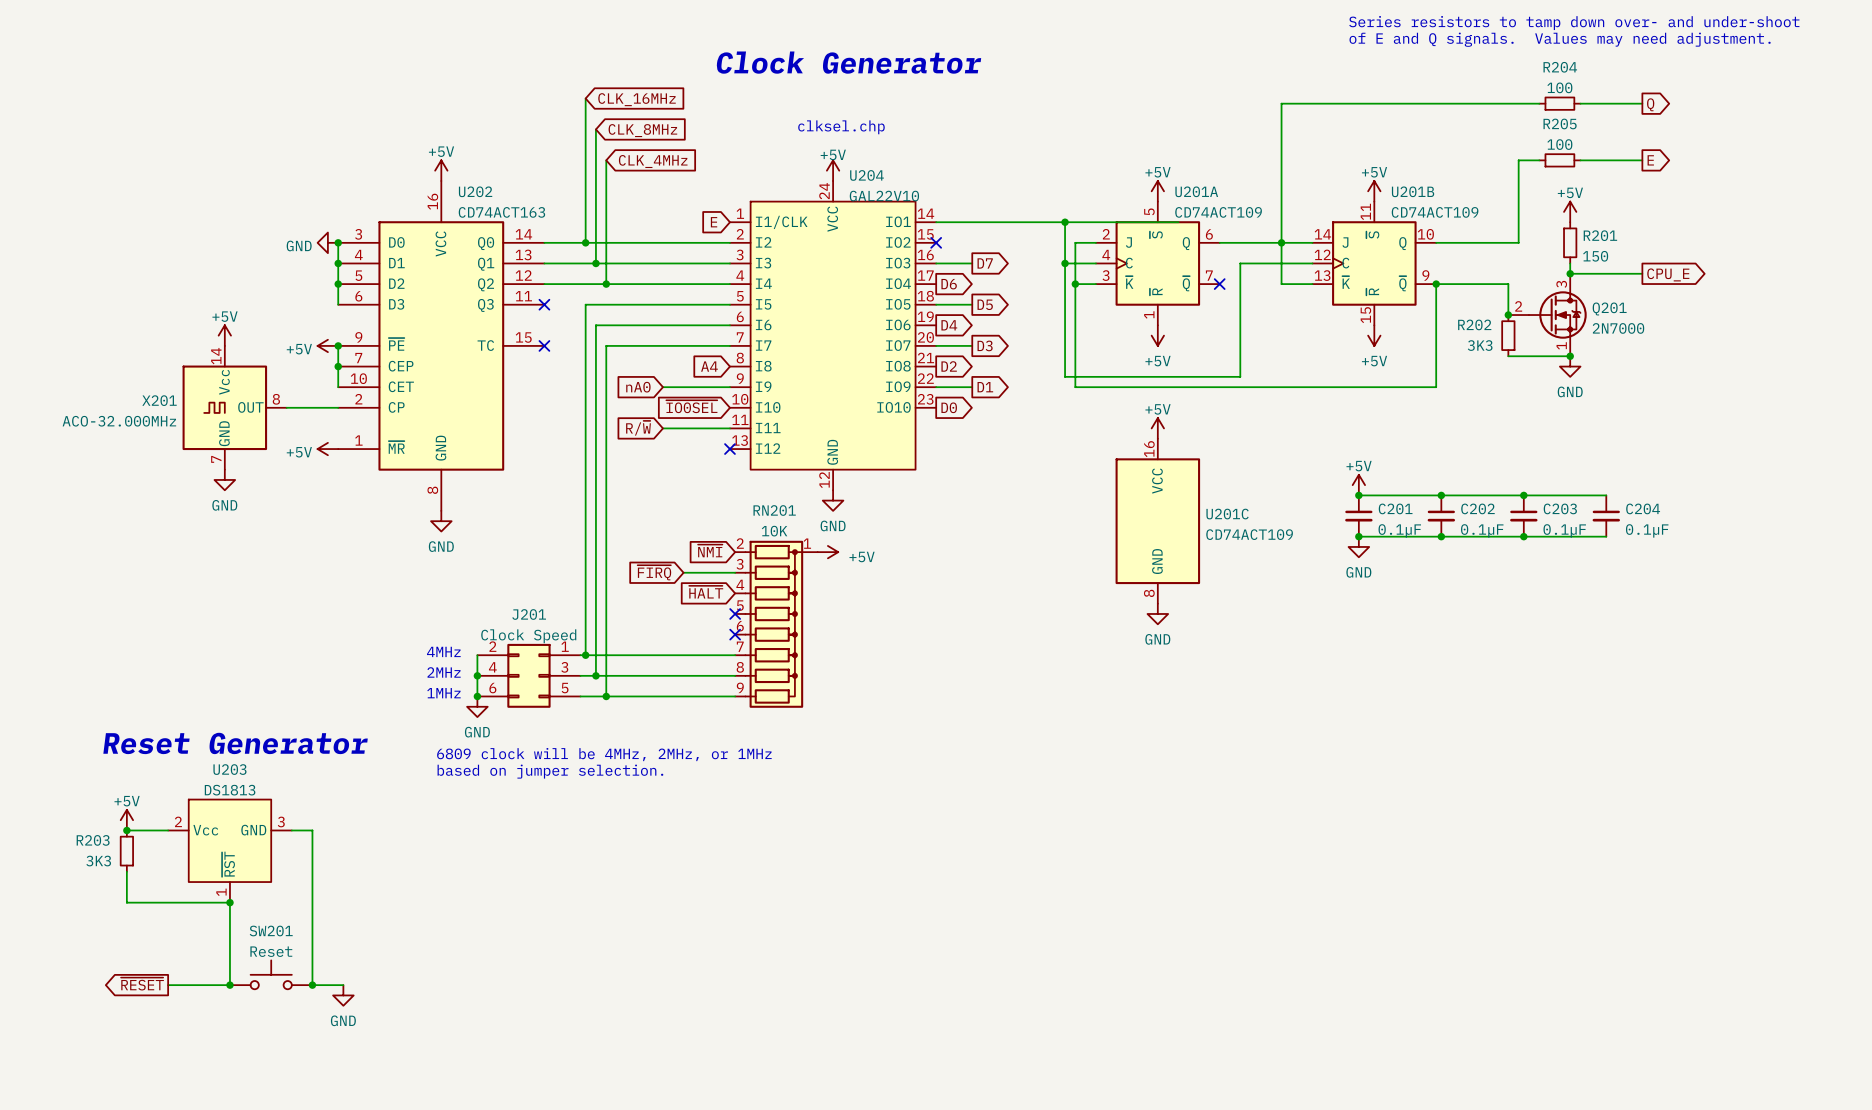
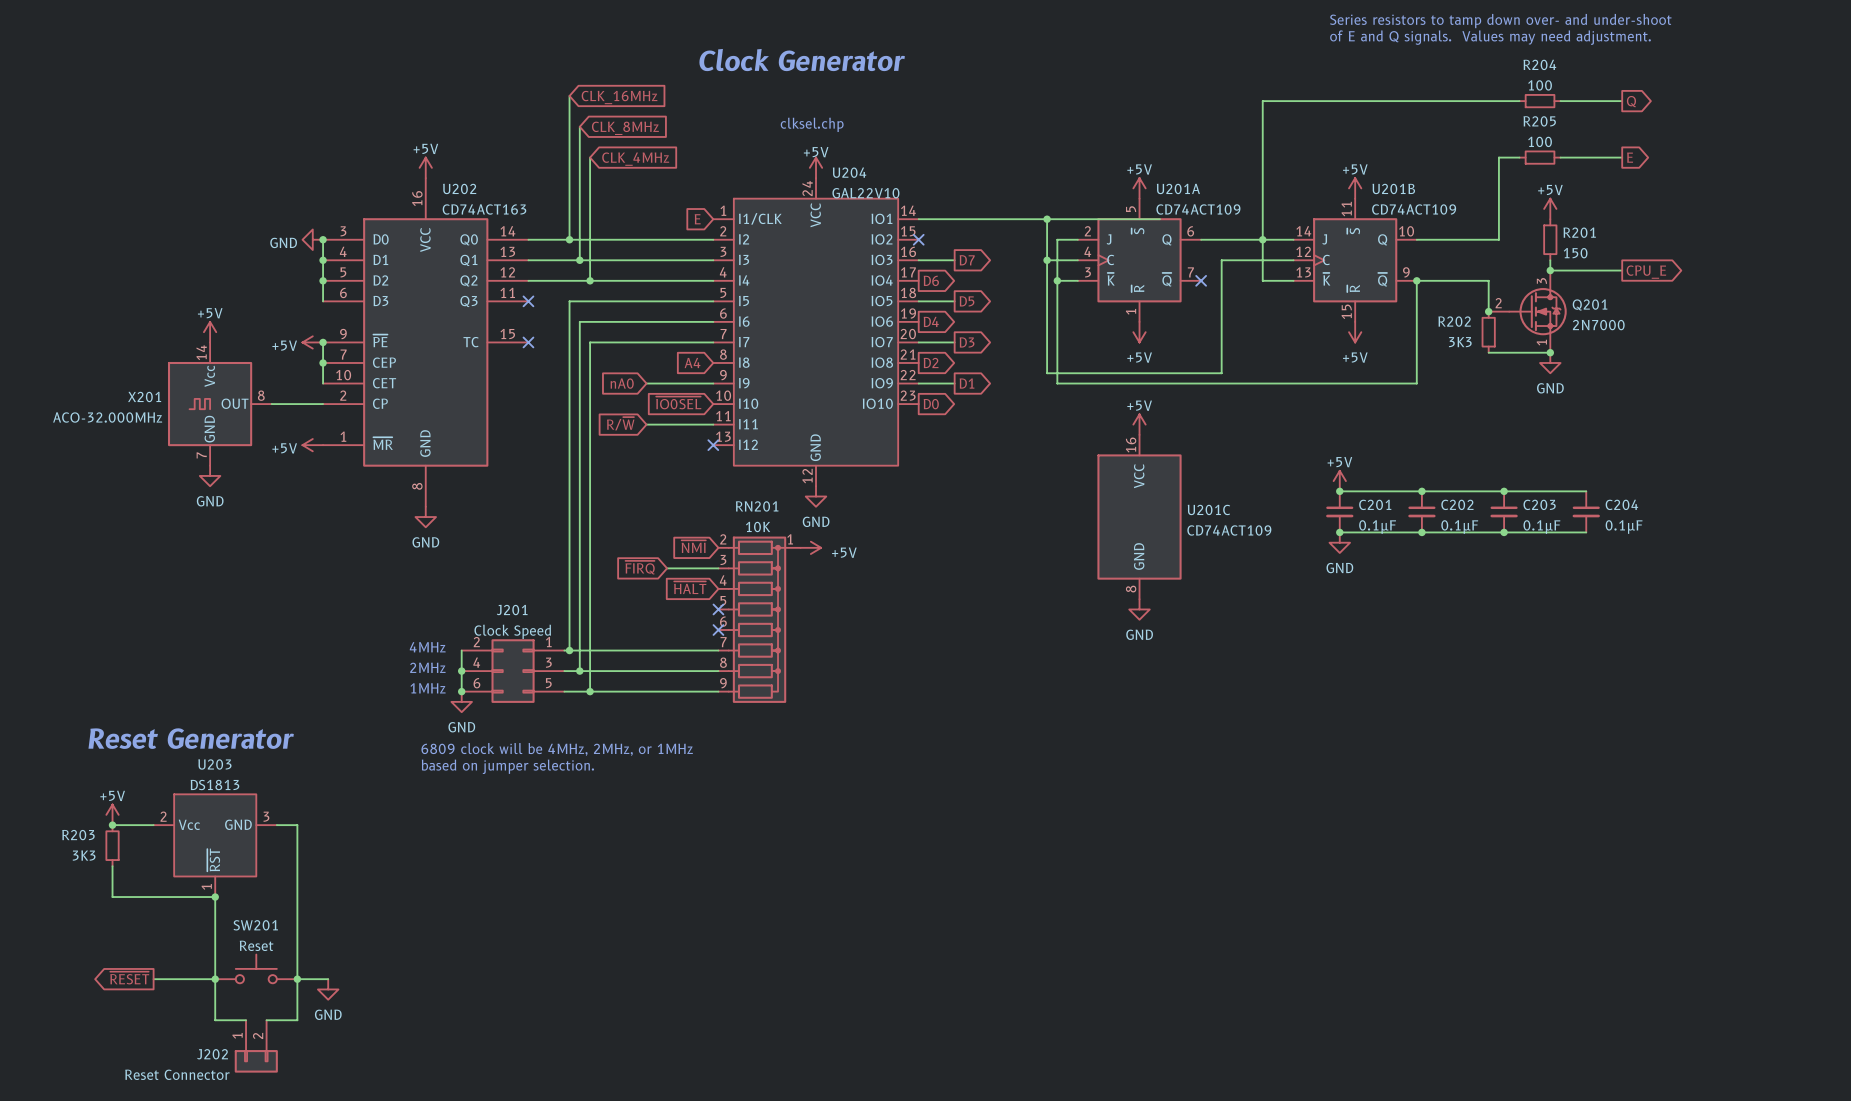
wire: none -> (215, 979) (215, 1020) (246, 1020)
wire: none -> (297, 979) (297, 1020) (266, 1020)
J202: none -> Reset Connector (256, 1046)

